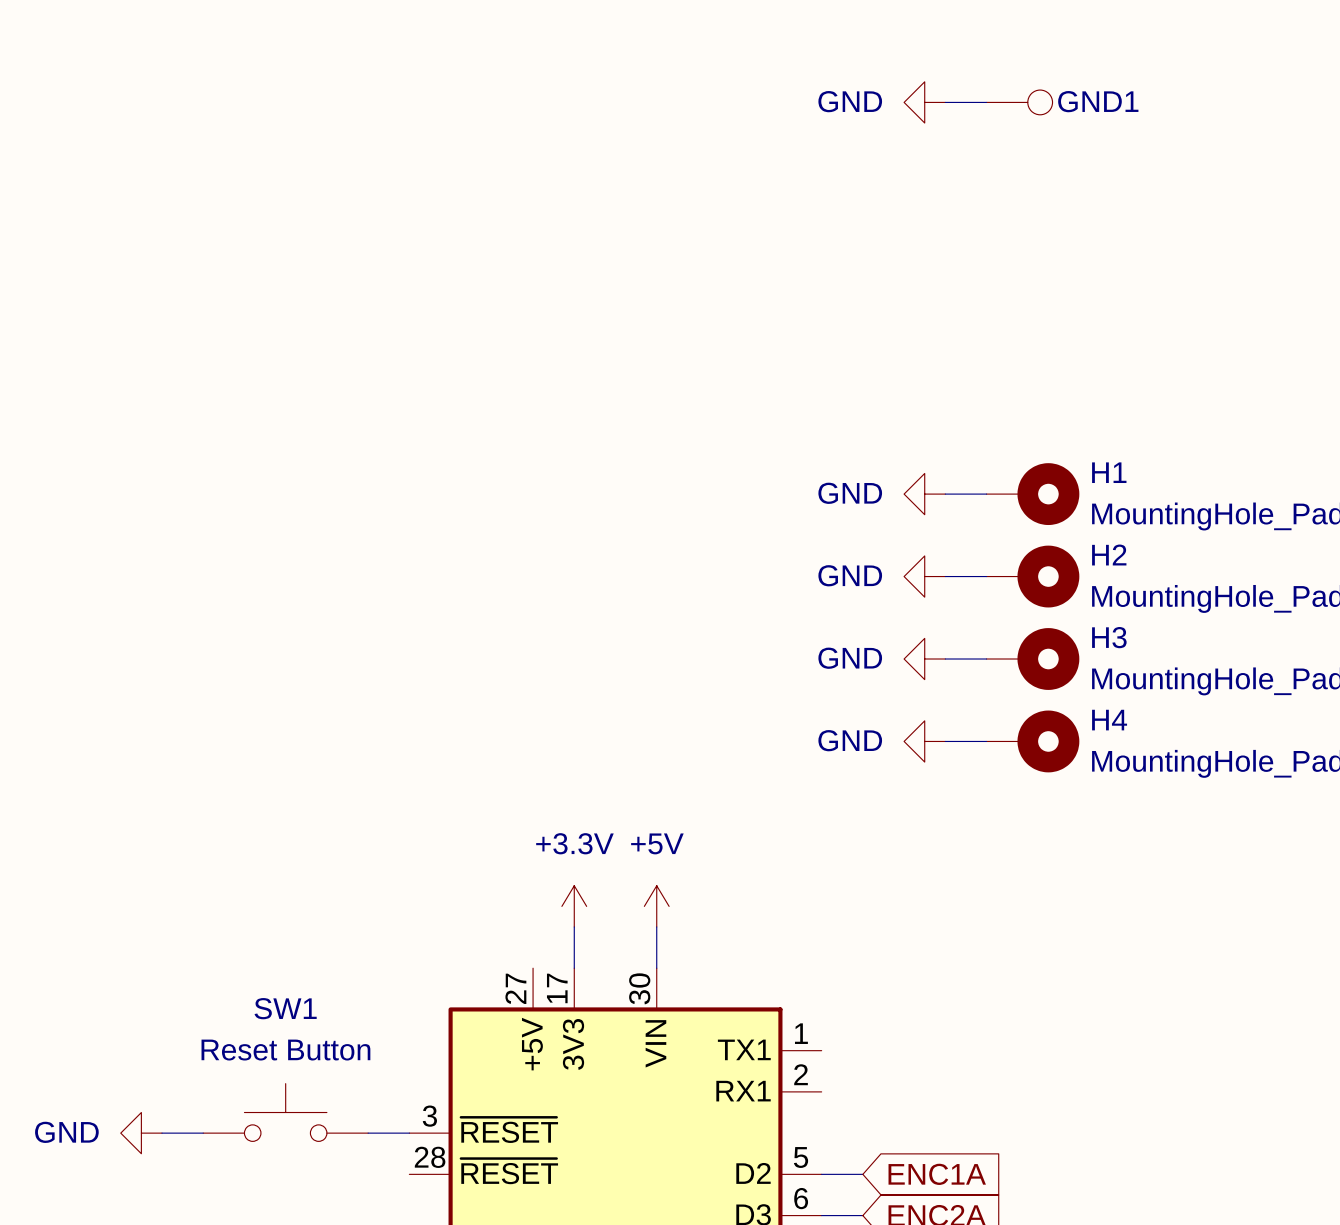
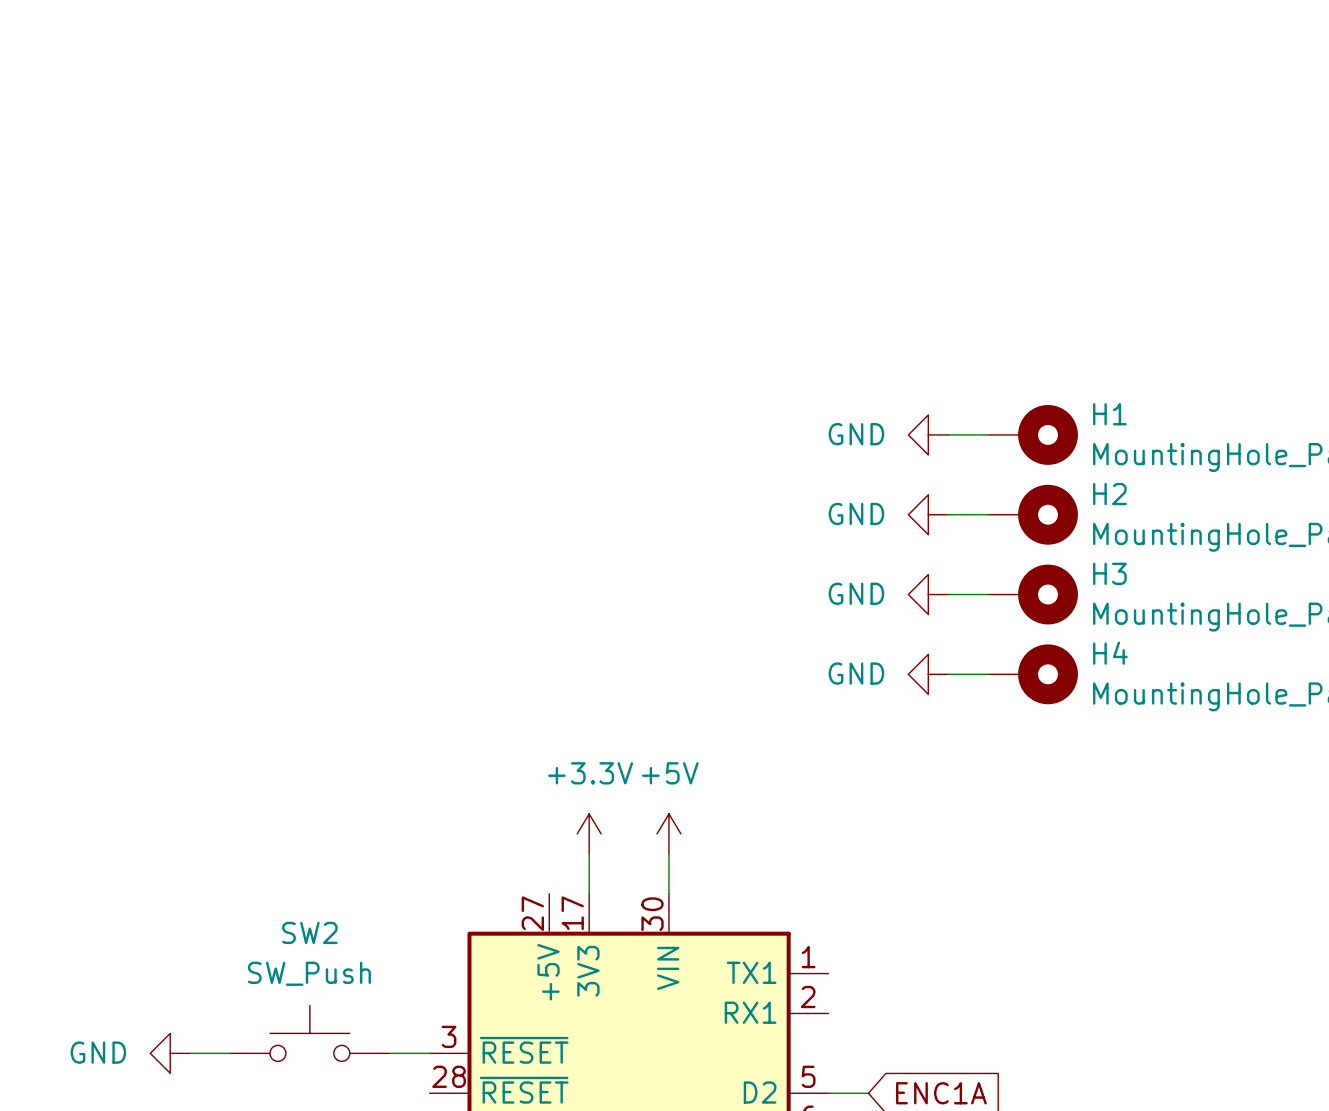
power symbol: GND (924, 102) -> none
wire: (945, 102) (986, 102) -> none
GND1: (1019, 102) -> none
SW1 name: SW1 (285, 1008) -> SW2 (309, 932)
SW1 value: Reset Button (285, 1050) -> SW_Push (309, 973)

